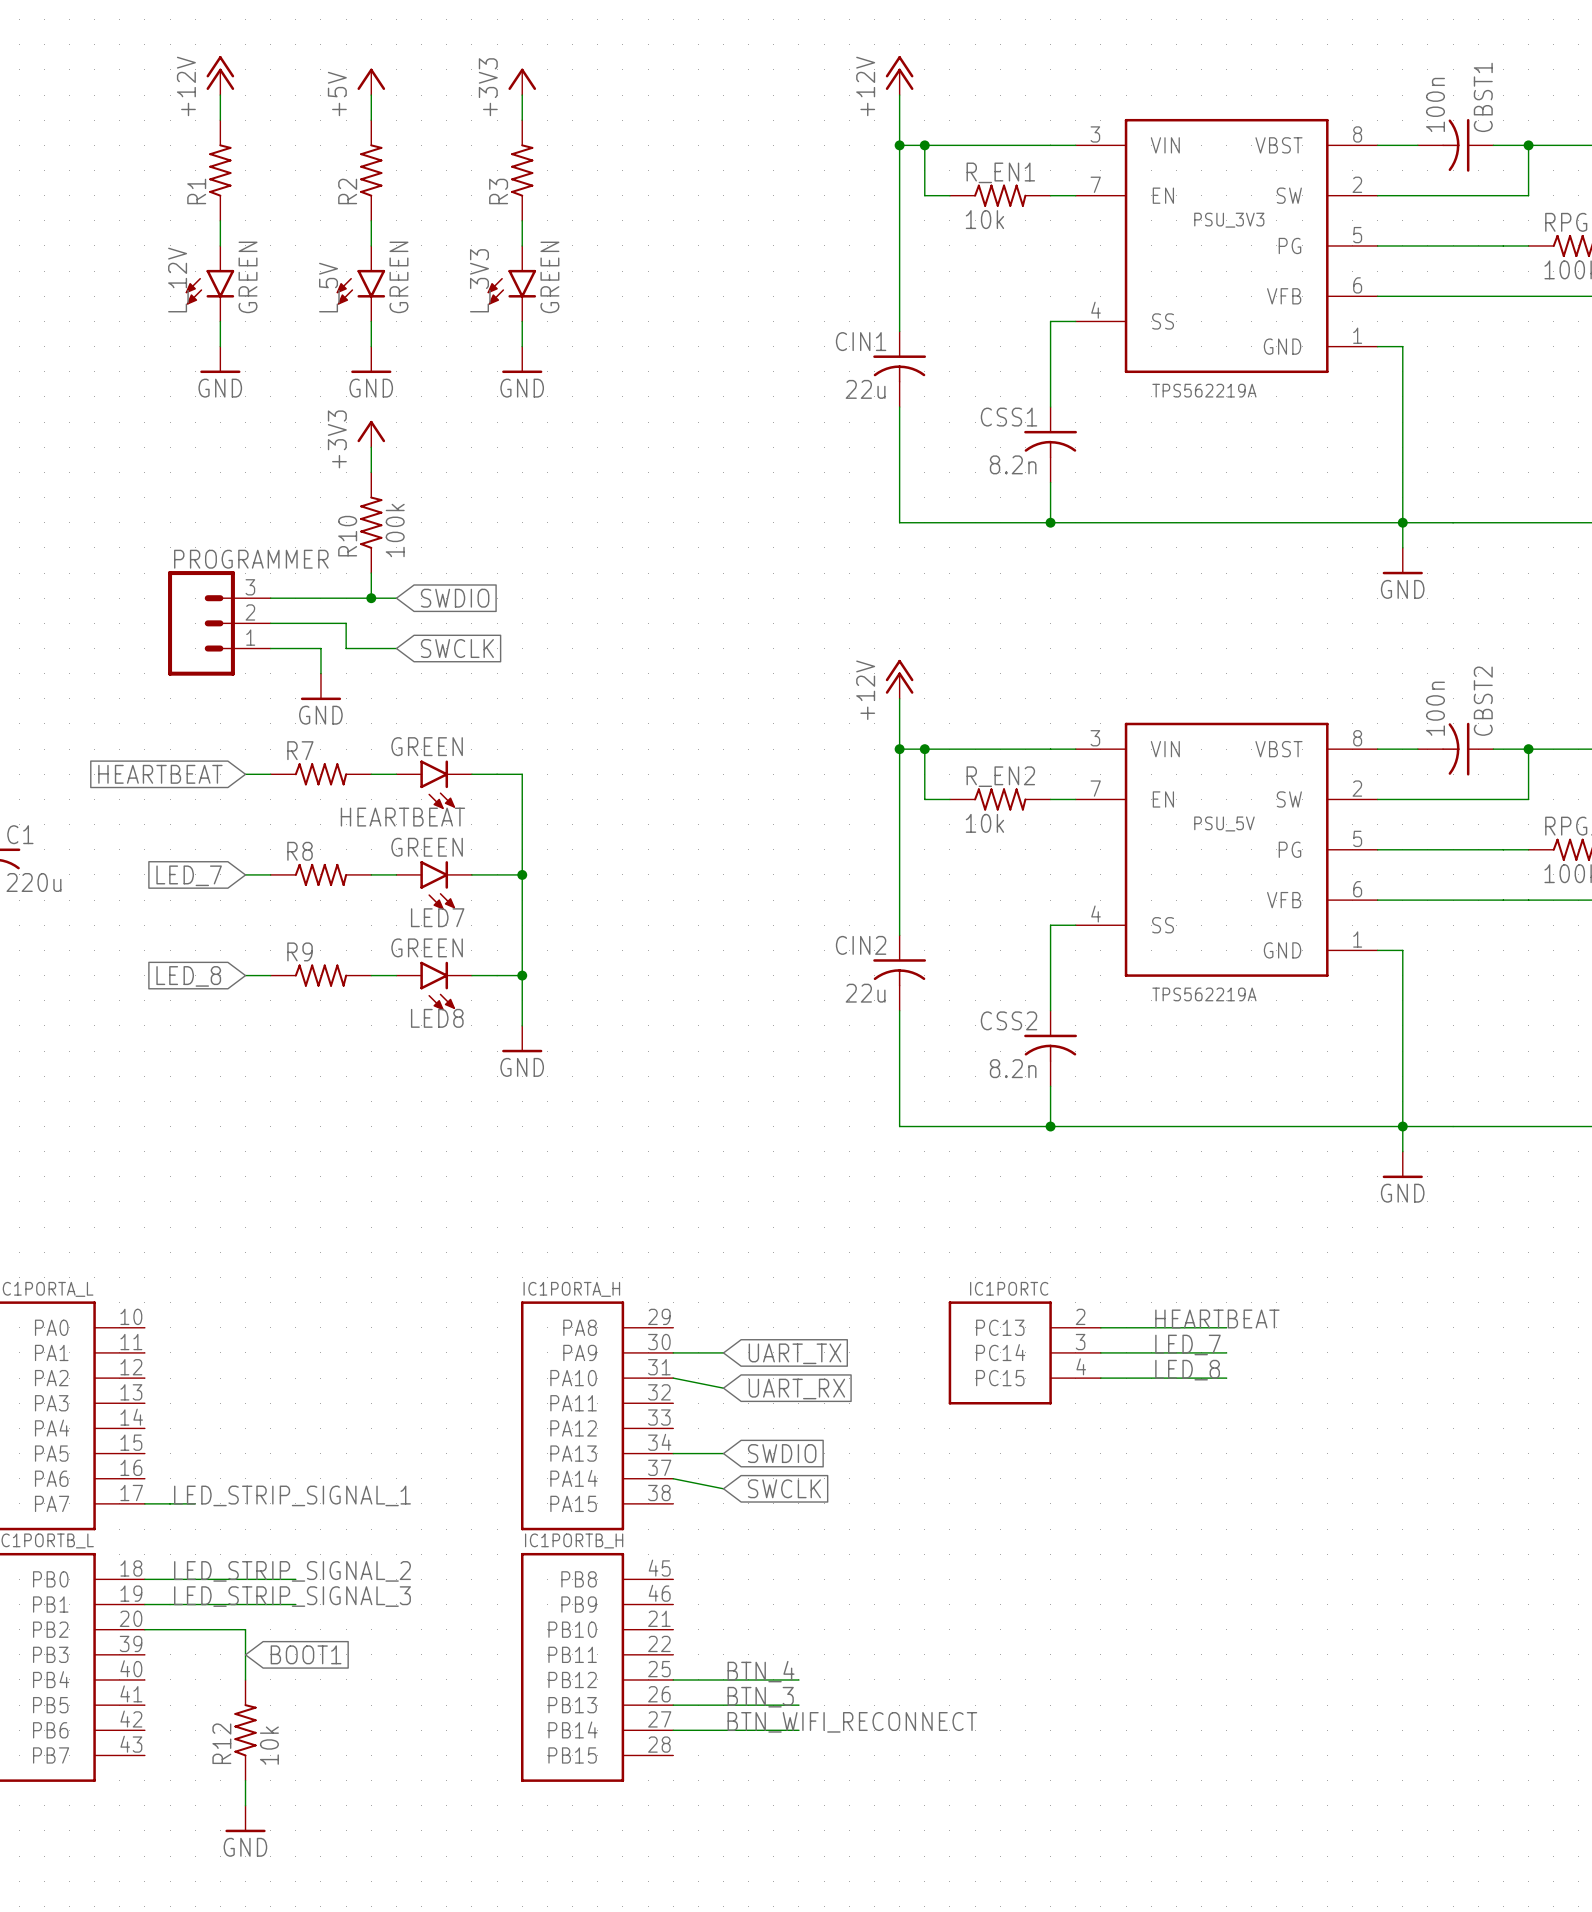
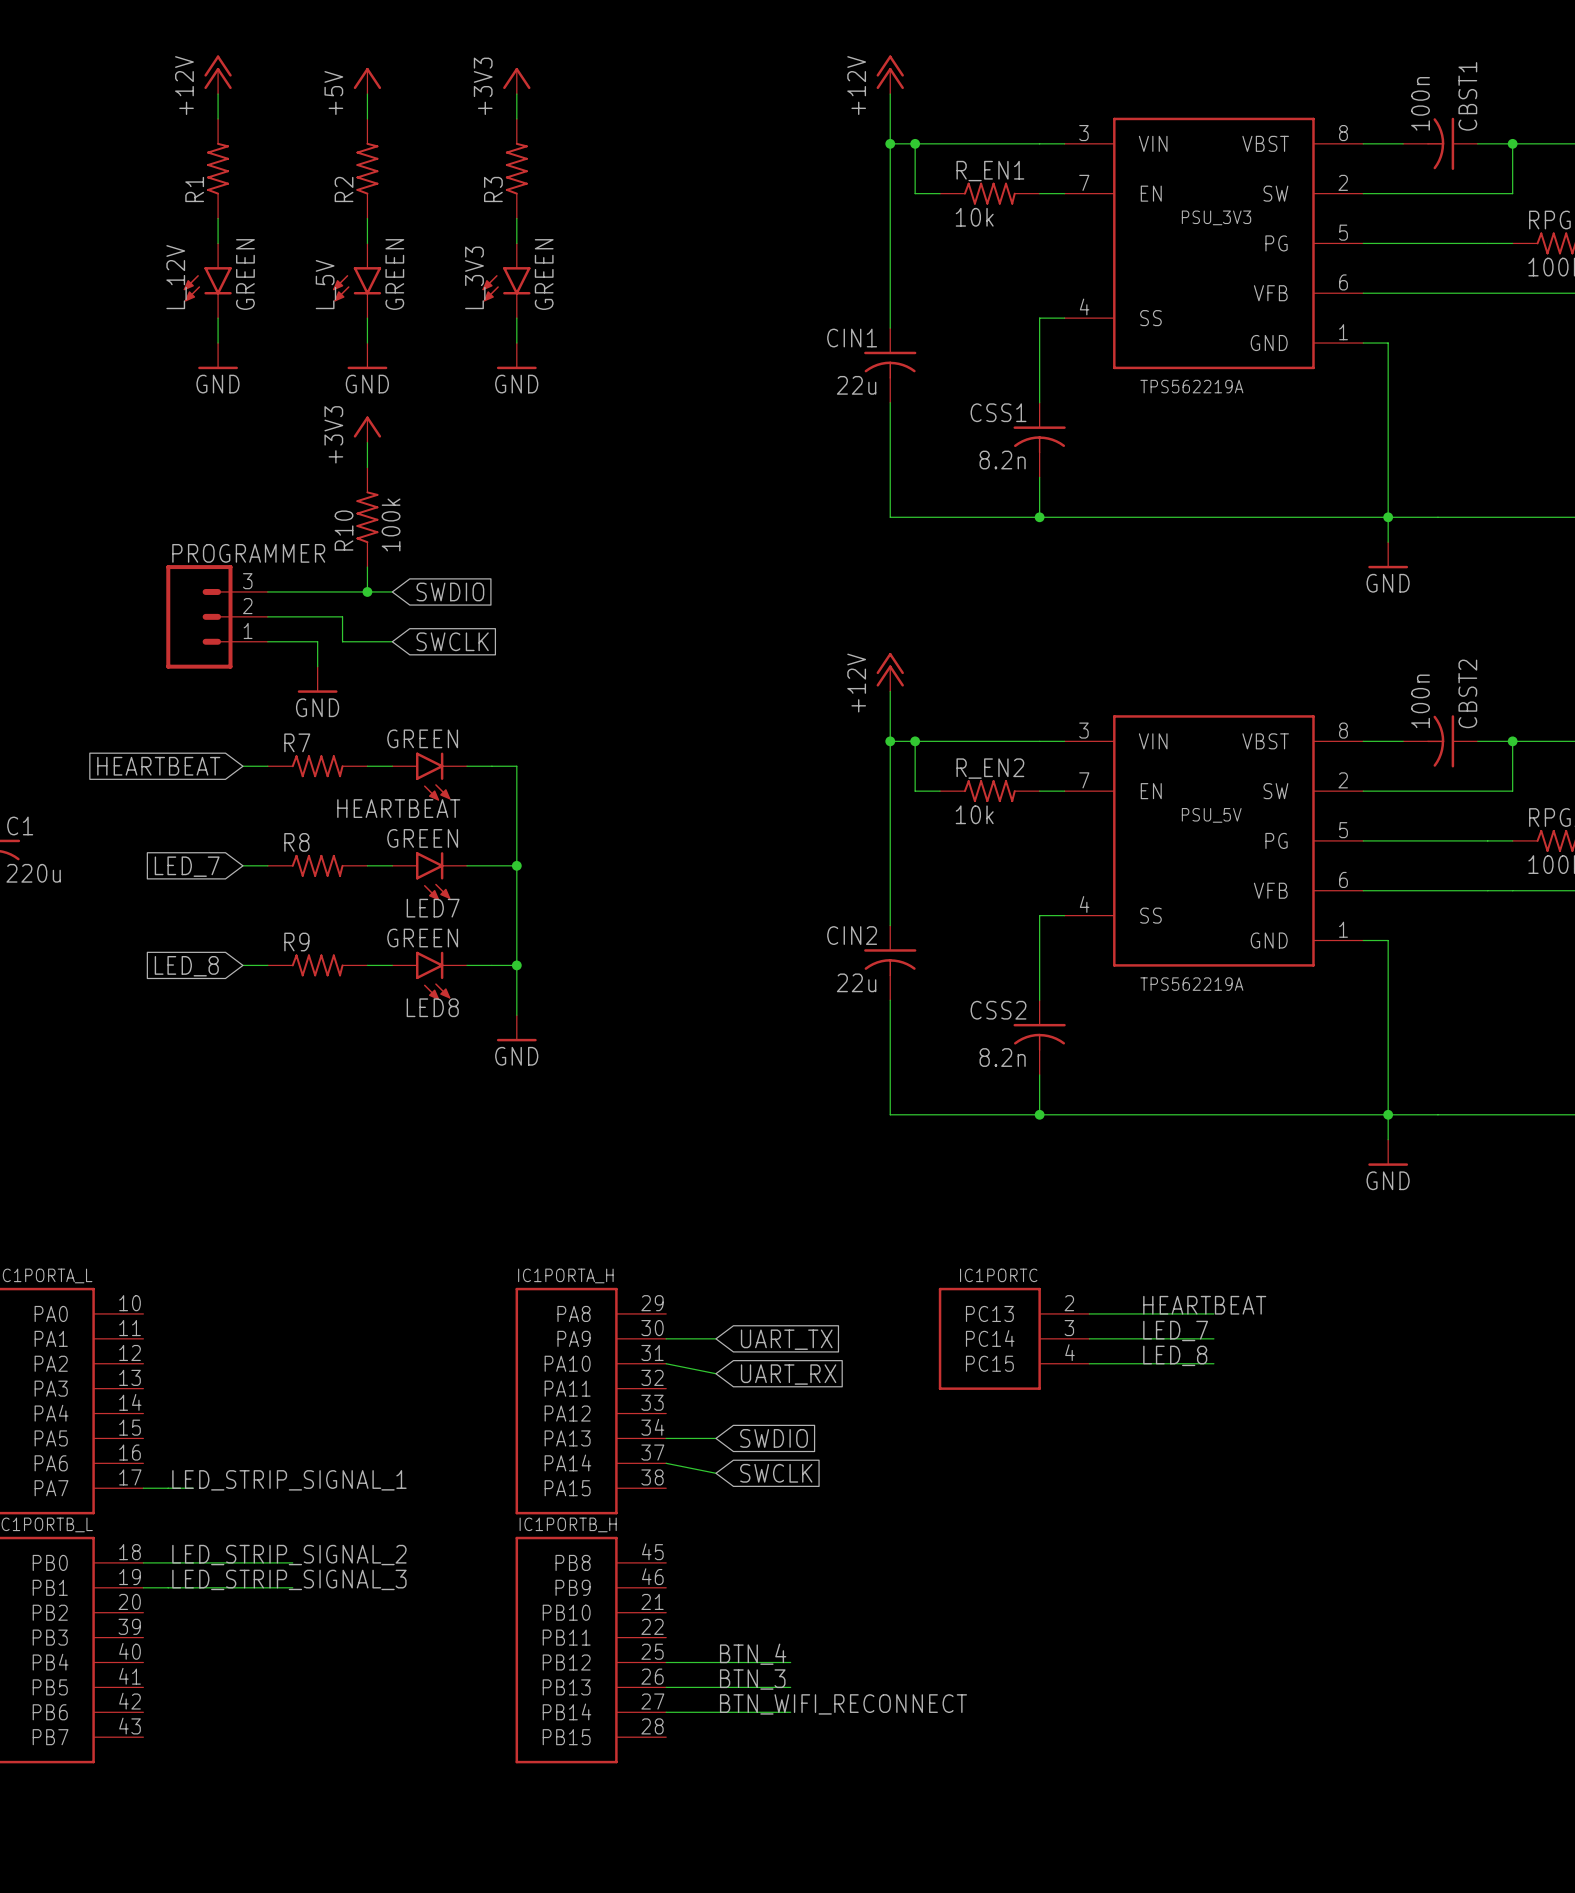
wire: (144, 1629) (245, 1629) (245, 1679) -> none
global label: BOOT1 (306, 1654) -> none
R12: 10k (245, 1730) -> none
wire: (245, 1780) (245, 1805) -> none
power symbol: GND (245, 1818) -> none

